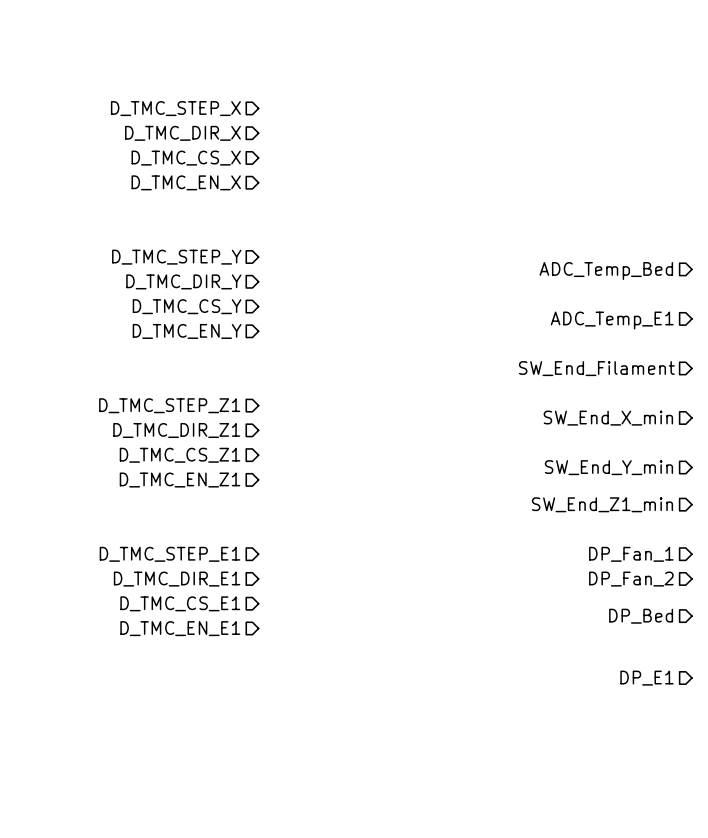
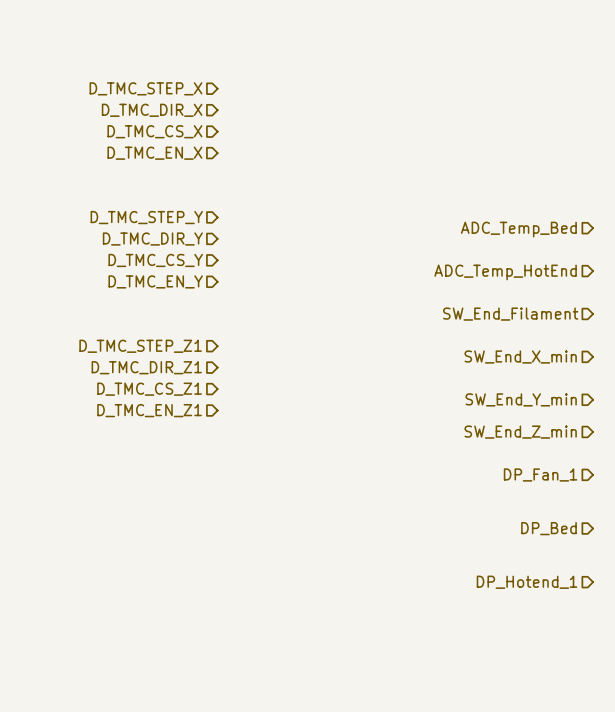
hierarchical label: ADC_Temp_E1 (612, 320) -> ADC_Temp_HotEnd (505, 272)
hierarchical label: SW_End_Z1_min (602, 504) -> SW_End_Z_min (520, 432)
hierarchical label: D_TMC_STEP_E1 (170, 554) -> none
hierarchical label: D_TMC_DIR_E1 (177, 579) -> none
hierarchical label: DP_Fan_2 (631, 579) -> none
hierarchical label: D_TMC_CS_E1 (180, 603) -> none
hierarchical label: D_TMC_EN_E1 (180, 628) -> none
hierarchical label: DP_E1 (646, 678) -> DP_Hotend_1 (527, 582)

